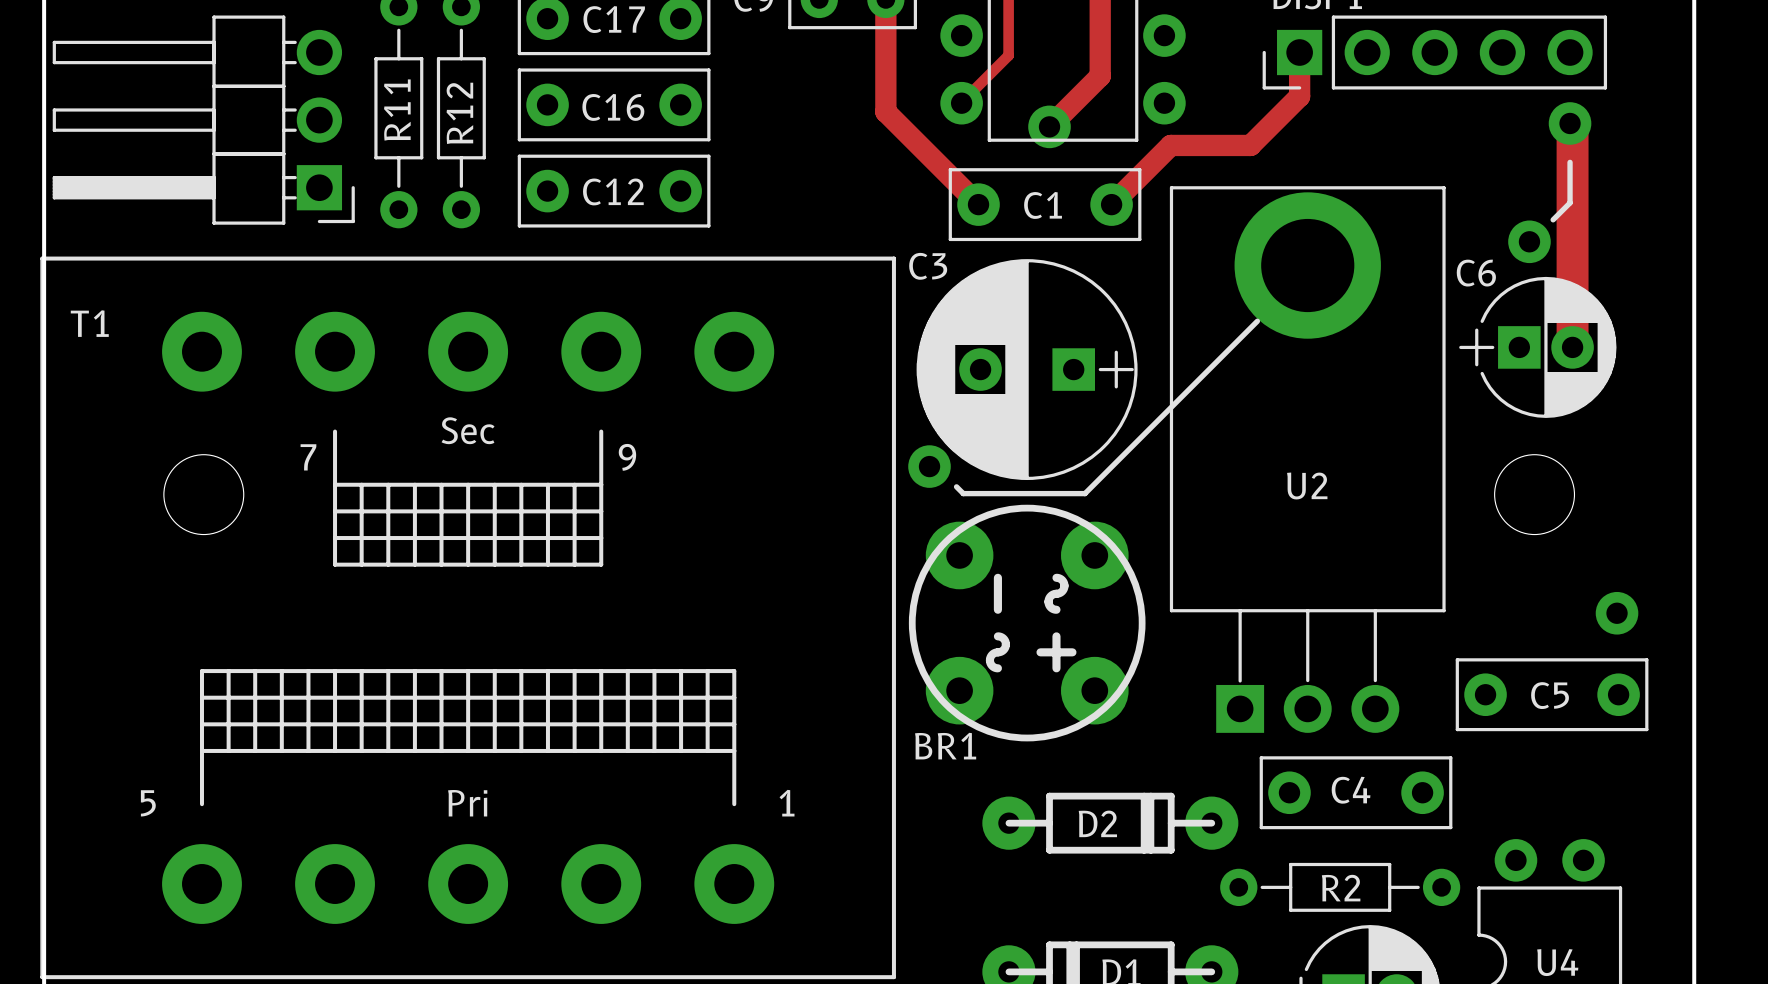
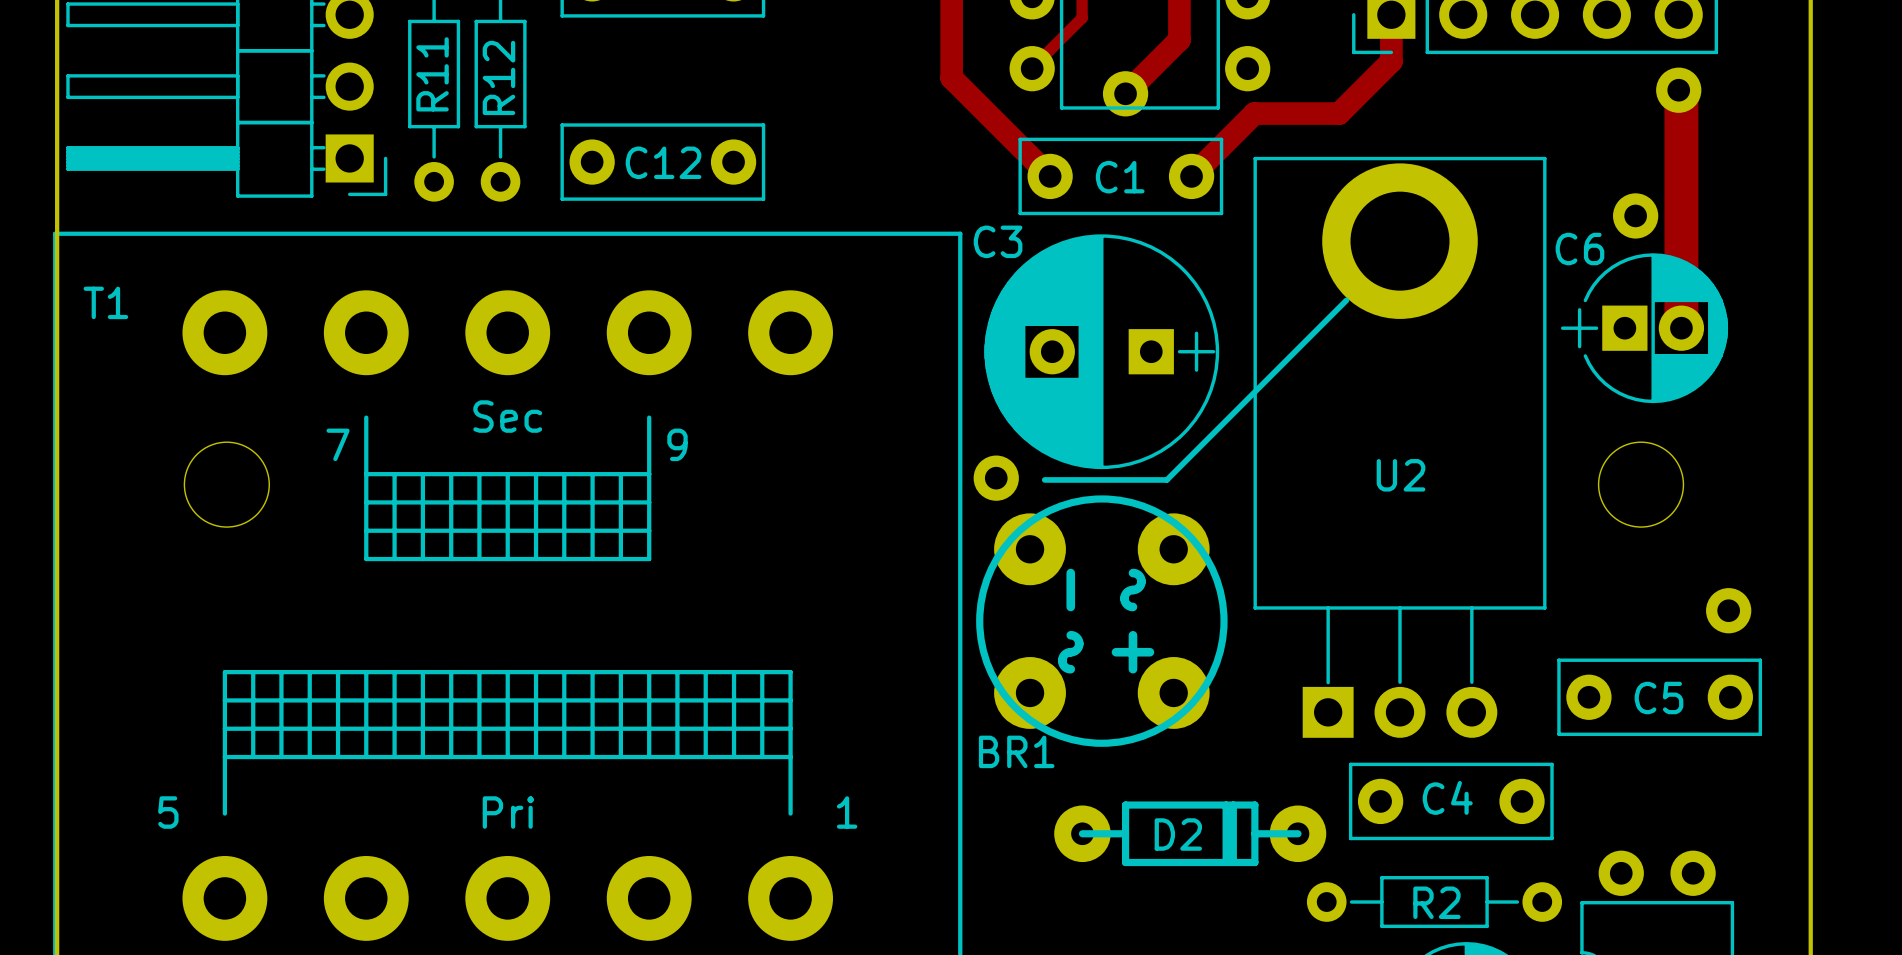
C16: (614, 104) -> none
line: (1570, 162) (1570, 202) (1553, 219) -> none
part position: (929, 466) -> (996, 478)
line: (956, 486) (963, 493) (1085, 493) (1088, 490) -> (1044, 479) (1166, 479)

